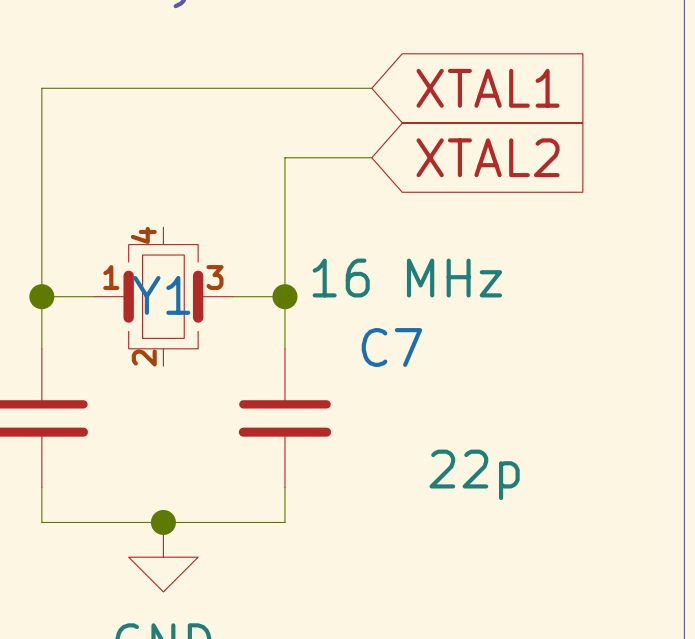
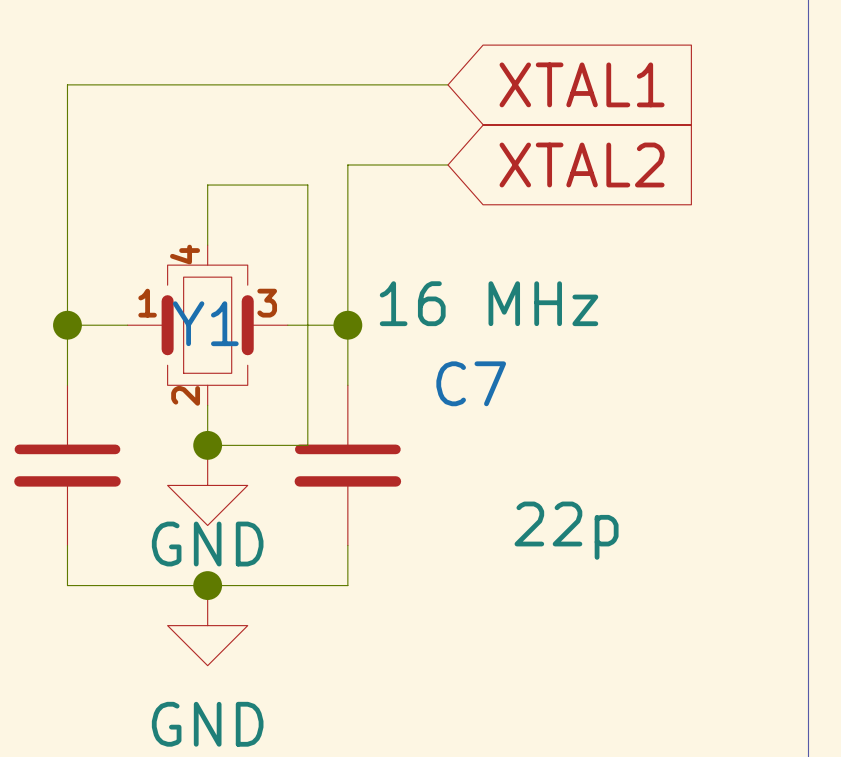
wire: none -> (207, 245) (207, 185) (307, 185) (307, 445) (207, 445) (207, 405)
junction: none -> (207, 445)
power symbol: none -> GND (207, 485)

